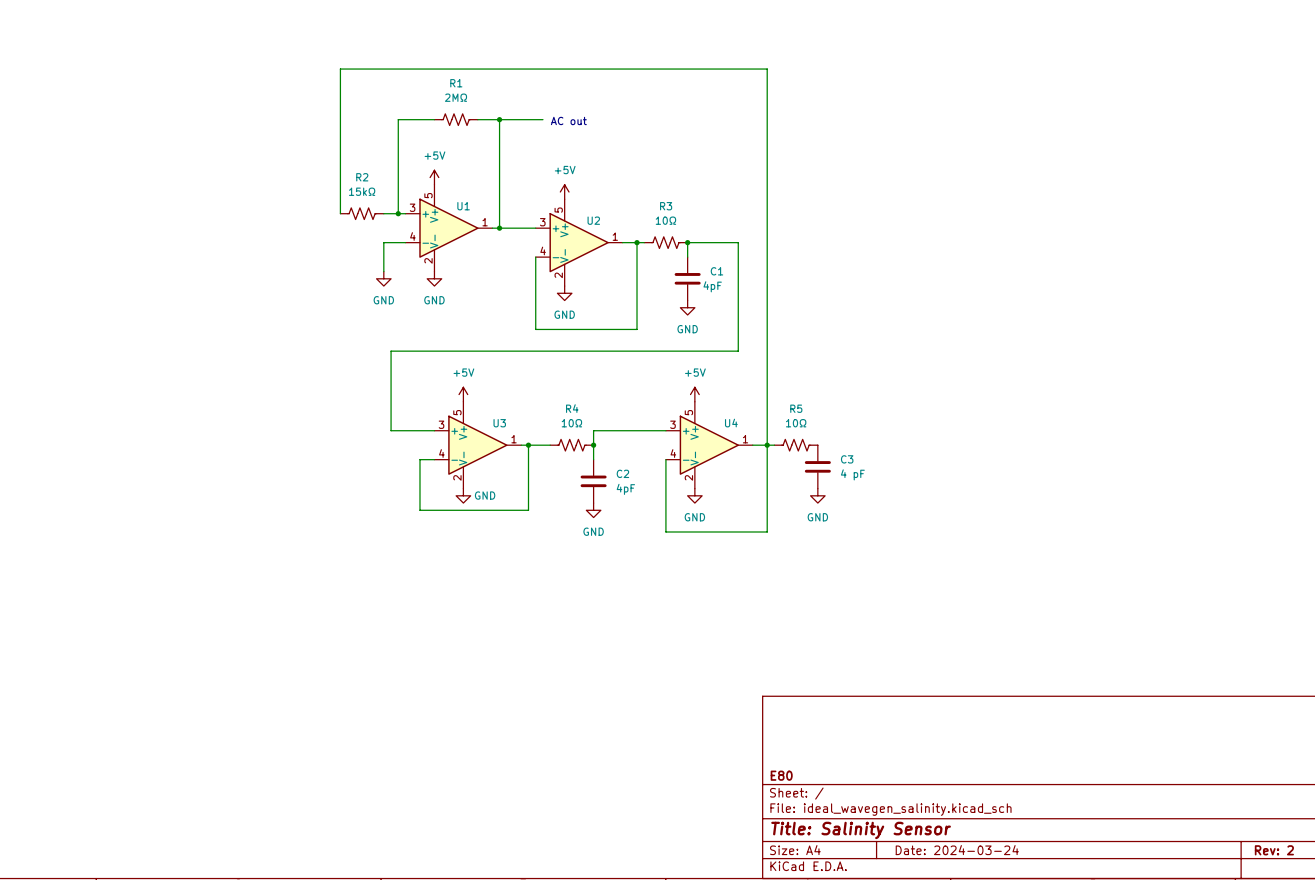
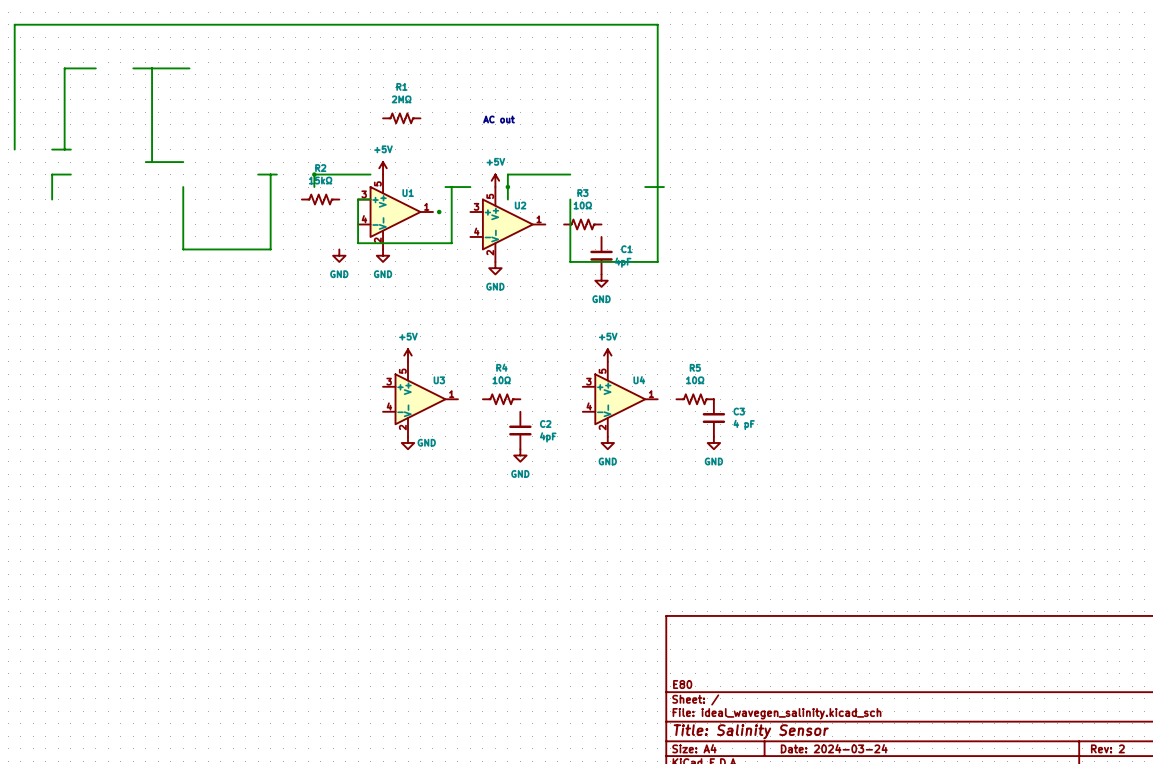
wire: none -> (95, 68) (64, 68) (64, 149)
wire: none -> (133, 68) (189, 68)
wire: none -> (152, 68) (152, 162)
wire: (434, 119) (398, 119) (398, 213) -> none
wire: (477, 119) (542, 119) -> none
wire: (499, 119) (499, 228) -> none
junction: (499, 119) -> none
wire: none -> (14, 149) (14, 24) (657, 24) (657, 261) (570, 261) (570, 199)
wire: none -> (52, 149) (70, 149)
wire: none -> (145, 162) (183, 162)
wire: none -> (70, 174) (52, 174) (52, 199)
wire: none -> (270, 174) (270, 249) (183, 249) (183, 187)
junction: none -> (314, 174)
wire: none -> (370, 174) (314, 174) (314, 187)
wire: none -> (570, 174) (507, 174) (507, 199)
wire: none -> (445, 187) (470, 187)
wire: none -> (451, 187) (451, 243) (358, 243) (358, 199) (370, 199)
junction: none -> (507, 187)
wire: (340, 213) (340, 69) (767, 69) (767, 531) (665, 531) (665, 459) -> none
wire: (383, 213) (405, 213) -> (258, 174) (276, 174)
junction: (398, 213) -> none
wire: (492, 228) (535, 228) -> none
wire: (405, 242) (383, 242) (383, 271) -> none
wire: (622, 242) (644, 242) -> (645, 187) (663, 187)
wire: (637, 242) (637, 329) (535, 329) (535, 257) -> none
junction: (637, 242) -> none
junction: (687, 242) -> none
wire: (687, 257) (687, 242) (738, 242) (738, 351) (391, 351) (391, 430) (434, 430) -> none
wire: (665, 430) (593, 430) (593, 459) -> none
wire: (521, 445) (550, 445) -> none
wire: (528, 445) (528, 510) (419, 510) (419, 459) (434, 459) -> none
junction: (528, 445) -> none
junction: (593, 445) -> none
wire: (752, 445) (774, 445) -> none
junction: (767, 445) -> none

